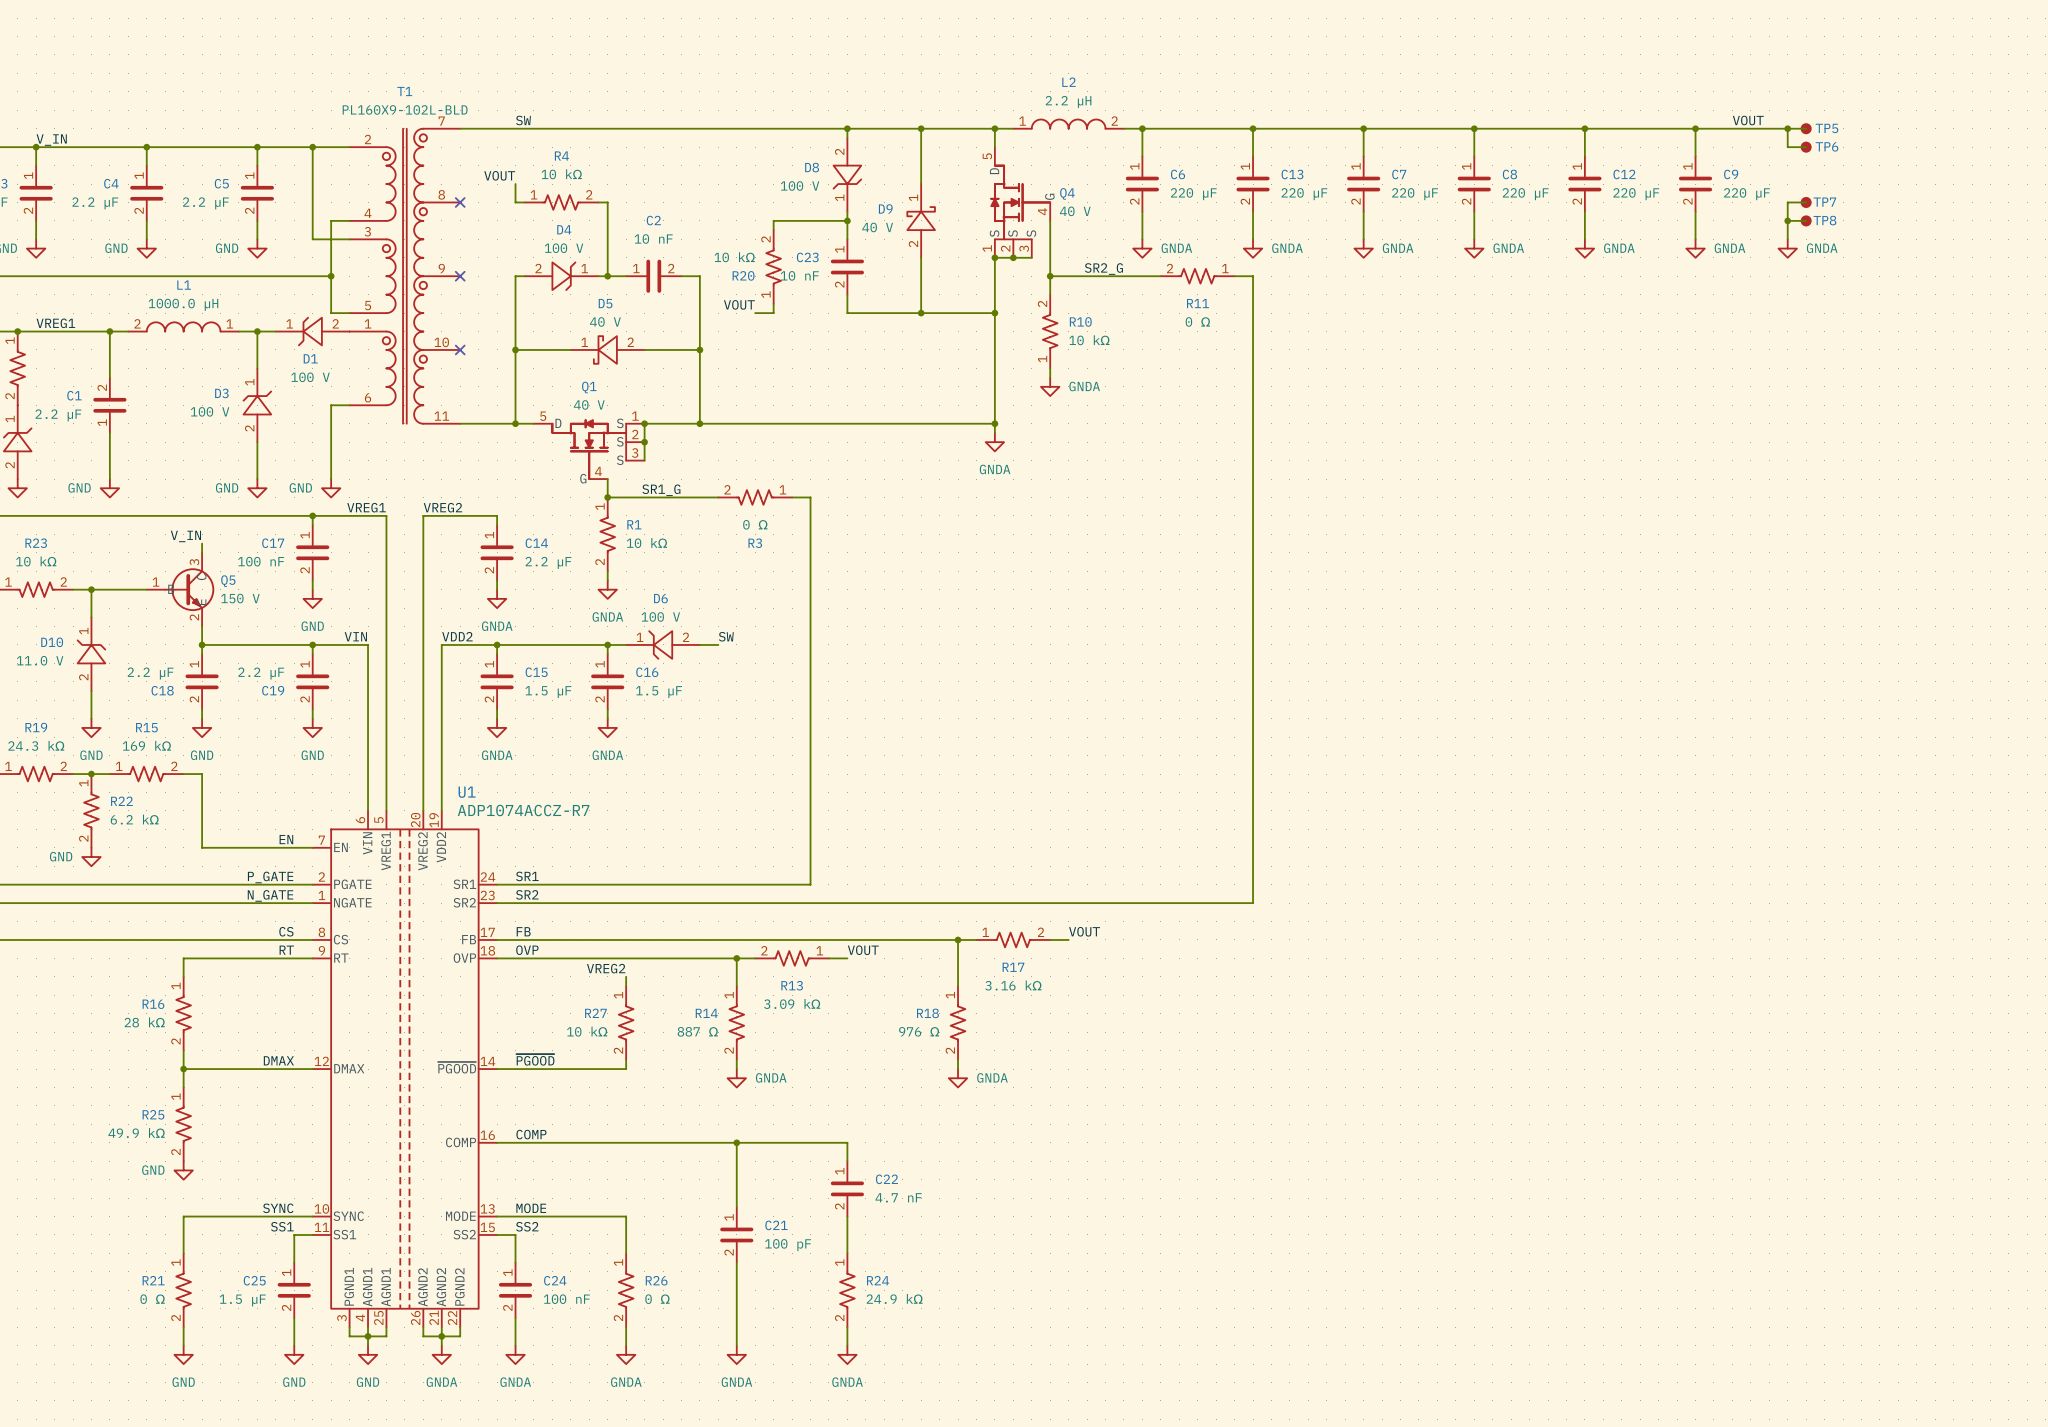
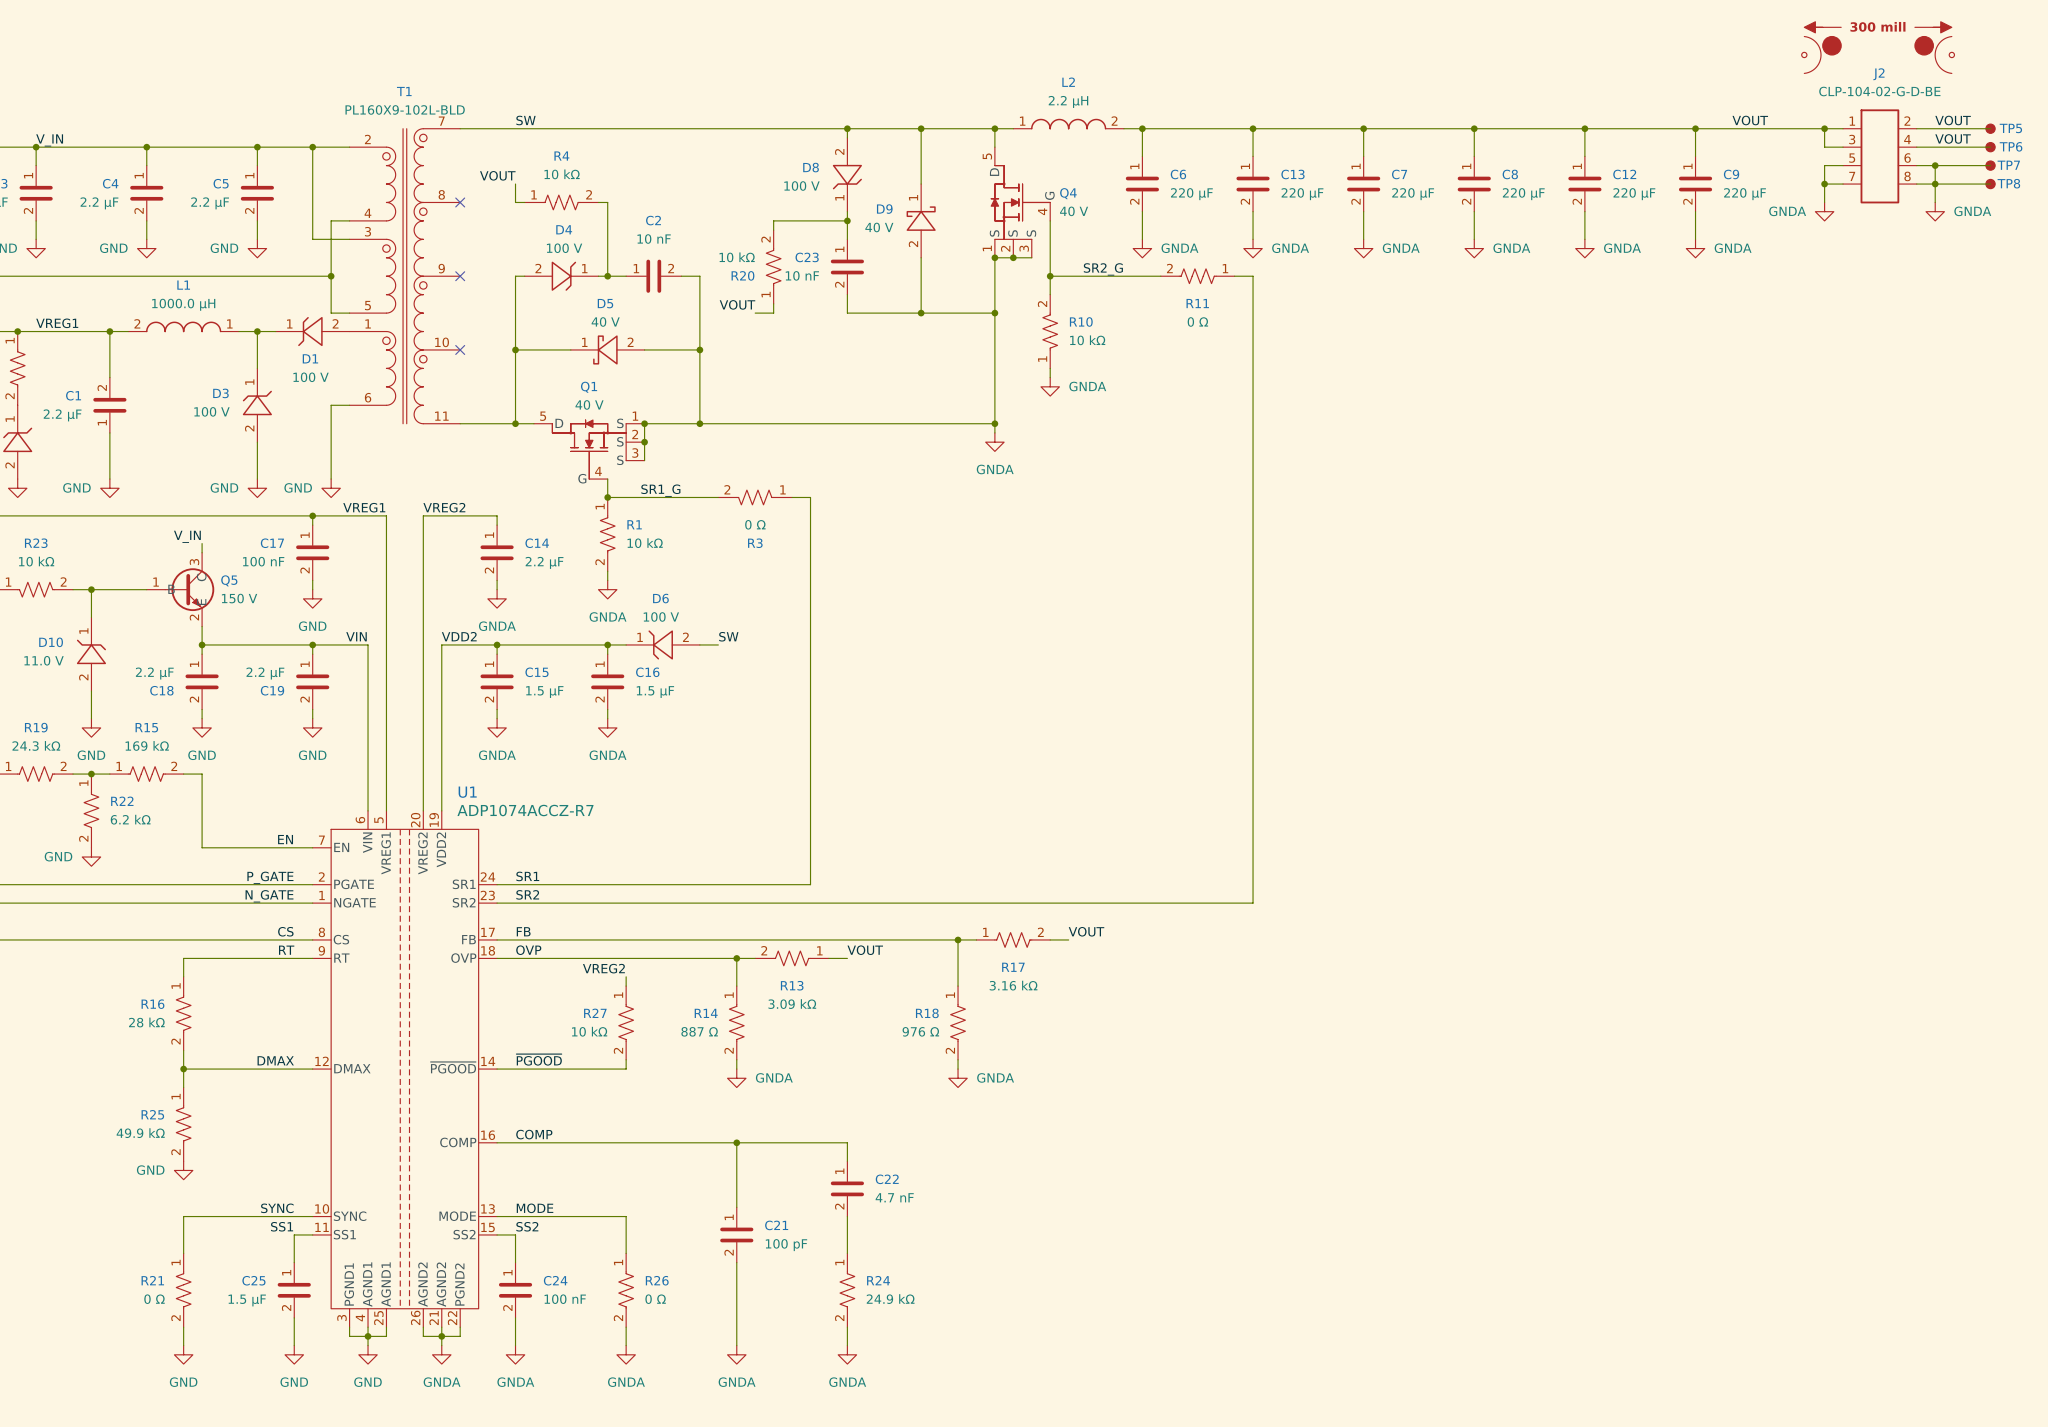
part: none -> (1878, 47)
label: none -> VOUT (1953, 120)
wire: (1787, 128) (1787, 147) (1806, 147) -> (1824, 128) (1824, 147) (1843, 147)
junction: (1787, 128) -> none
wire: none -> (1806, 128) (1843, 128)
TP5 position: (1806, 128) -> (1990, 128)
junction: none -> (1824, 128)
wire: none -> (1916, 128) (1990, 128)
label: none -> VOUT (1953, 138)
TP6 position: (1806, 147) -> (1990, 147)
wire: none -> (1916, 147) (1990, 147)
J2: none -> CLP-104-02-G-D-BE (1879, 156)
wire: none -> (1916, 165) (1990, 165)
wire: none -> (1935, 165) (1935, 202)
junction: none -> (1935, 165)
junction: none -> (1824, 184)
wire: none -> (1916, 184) (1990, 184)
junction: none -> (1935, 184)
wire: (1806, 202) (1787, 202) (1787, 239) -> (1843, 165) (1824, 165) (1824, 202)
TP7 position: (1806, 202) -> (1990, 165)
power symbol: none -> GNDA (1935, 211)
wire: (1787, 220) (1806, 220) -> (1824, 184) (1843, 184)
junction: (1787, 220) -> none
TP8 position: (1806, 220) -> (1990, 184)
power symbol position: GNDA (1787, 248) -> GNDA (1824, 211)
power symbol text position: GNDA (1822, 248) -> GNDA (1787, 211)

